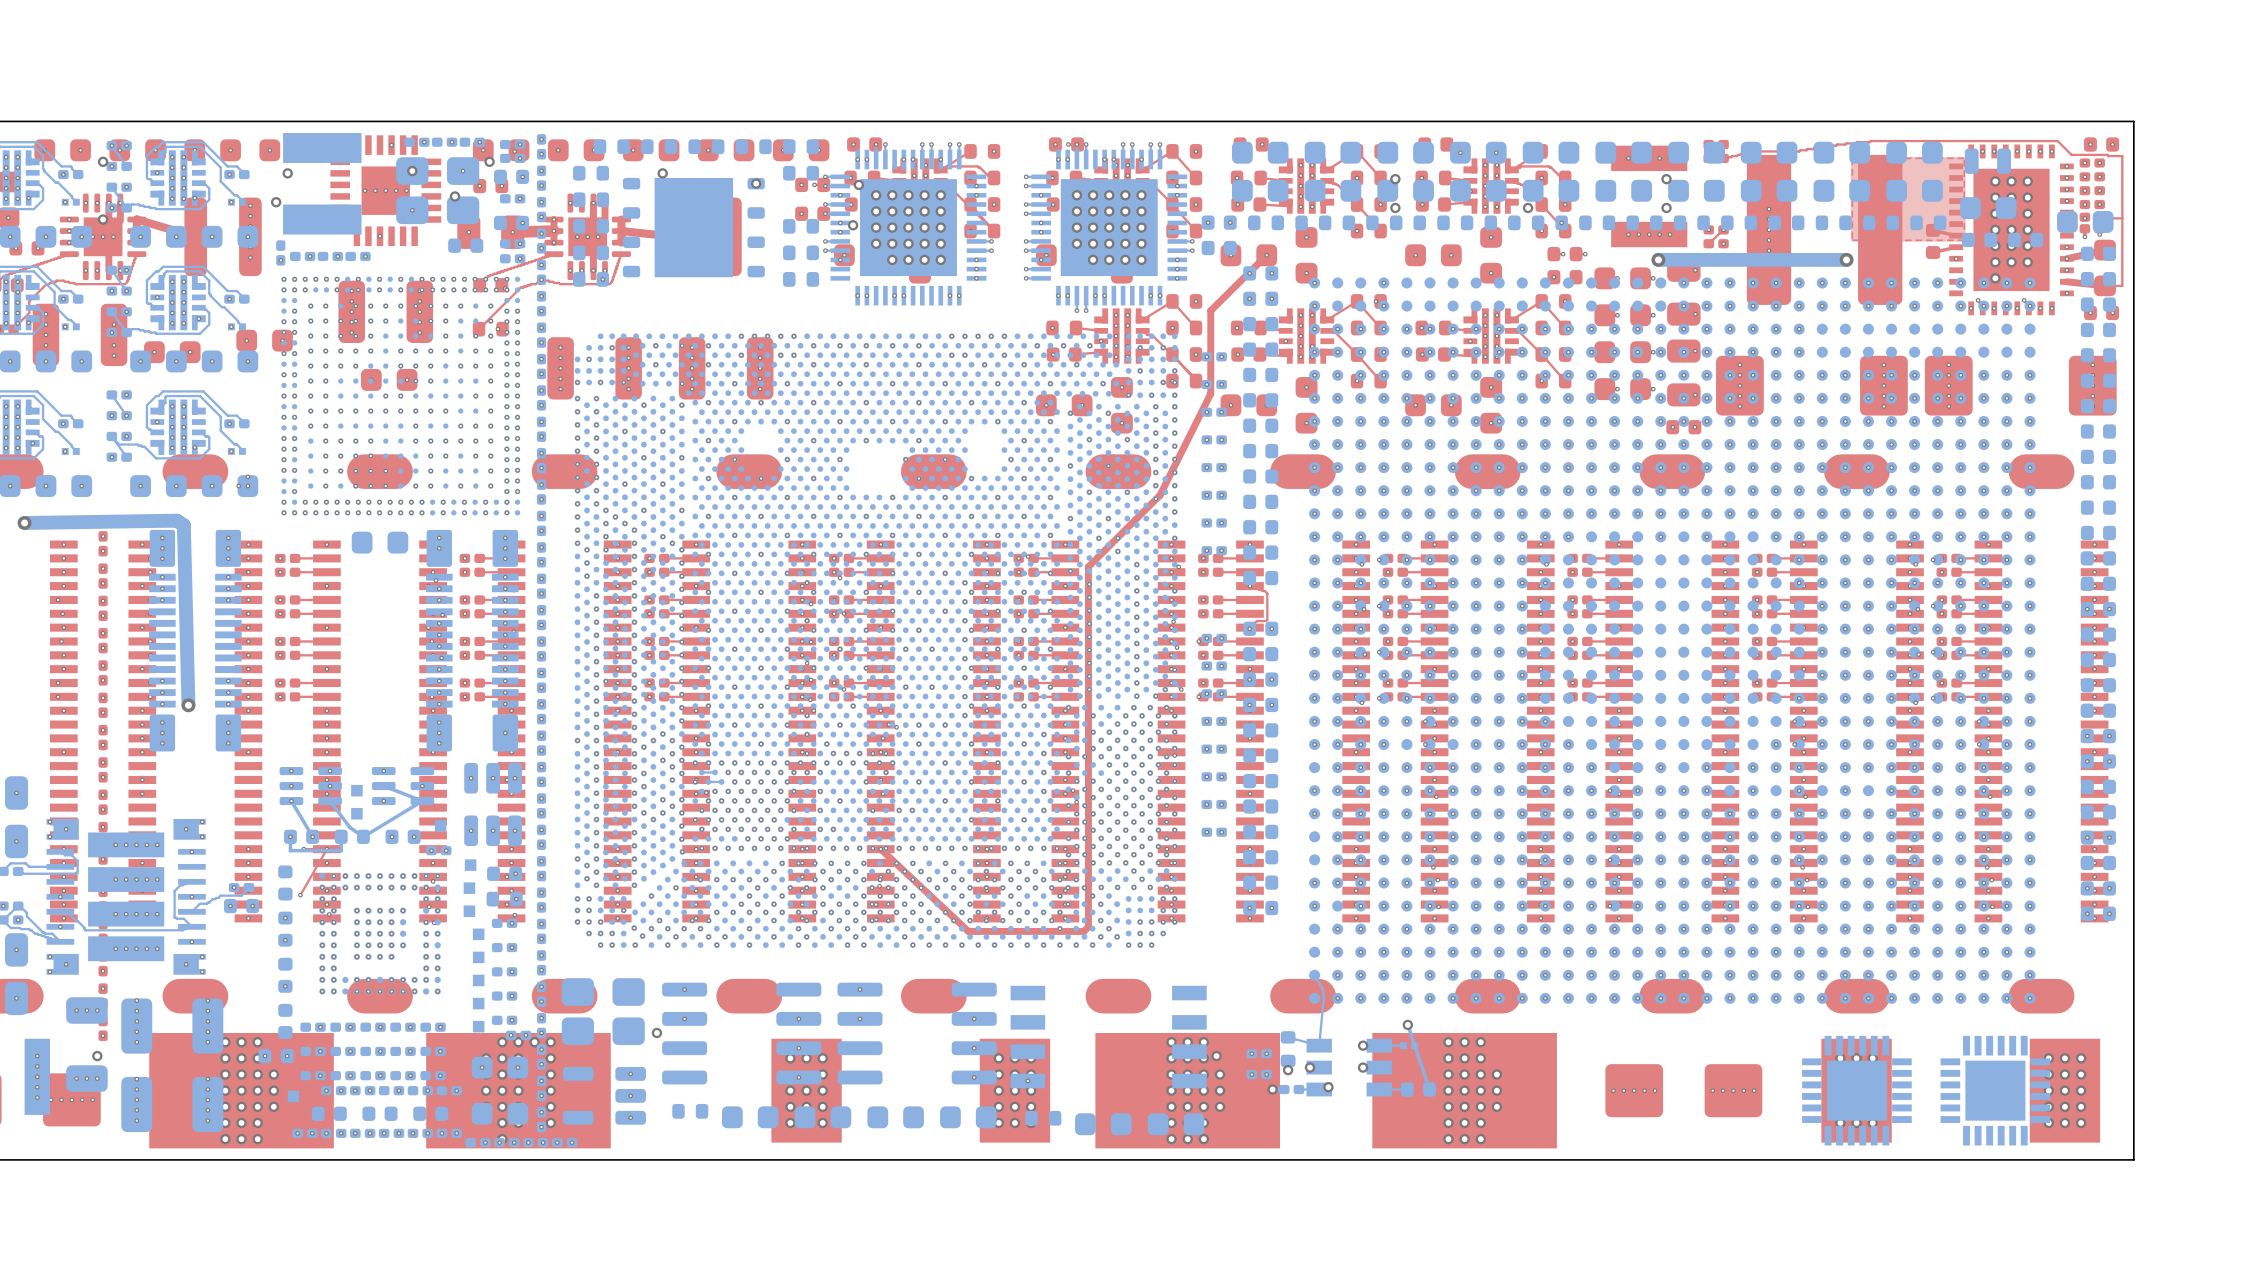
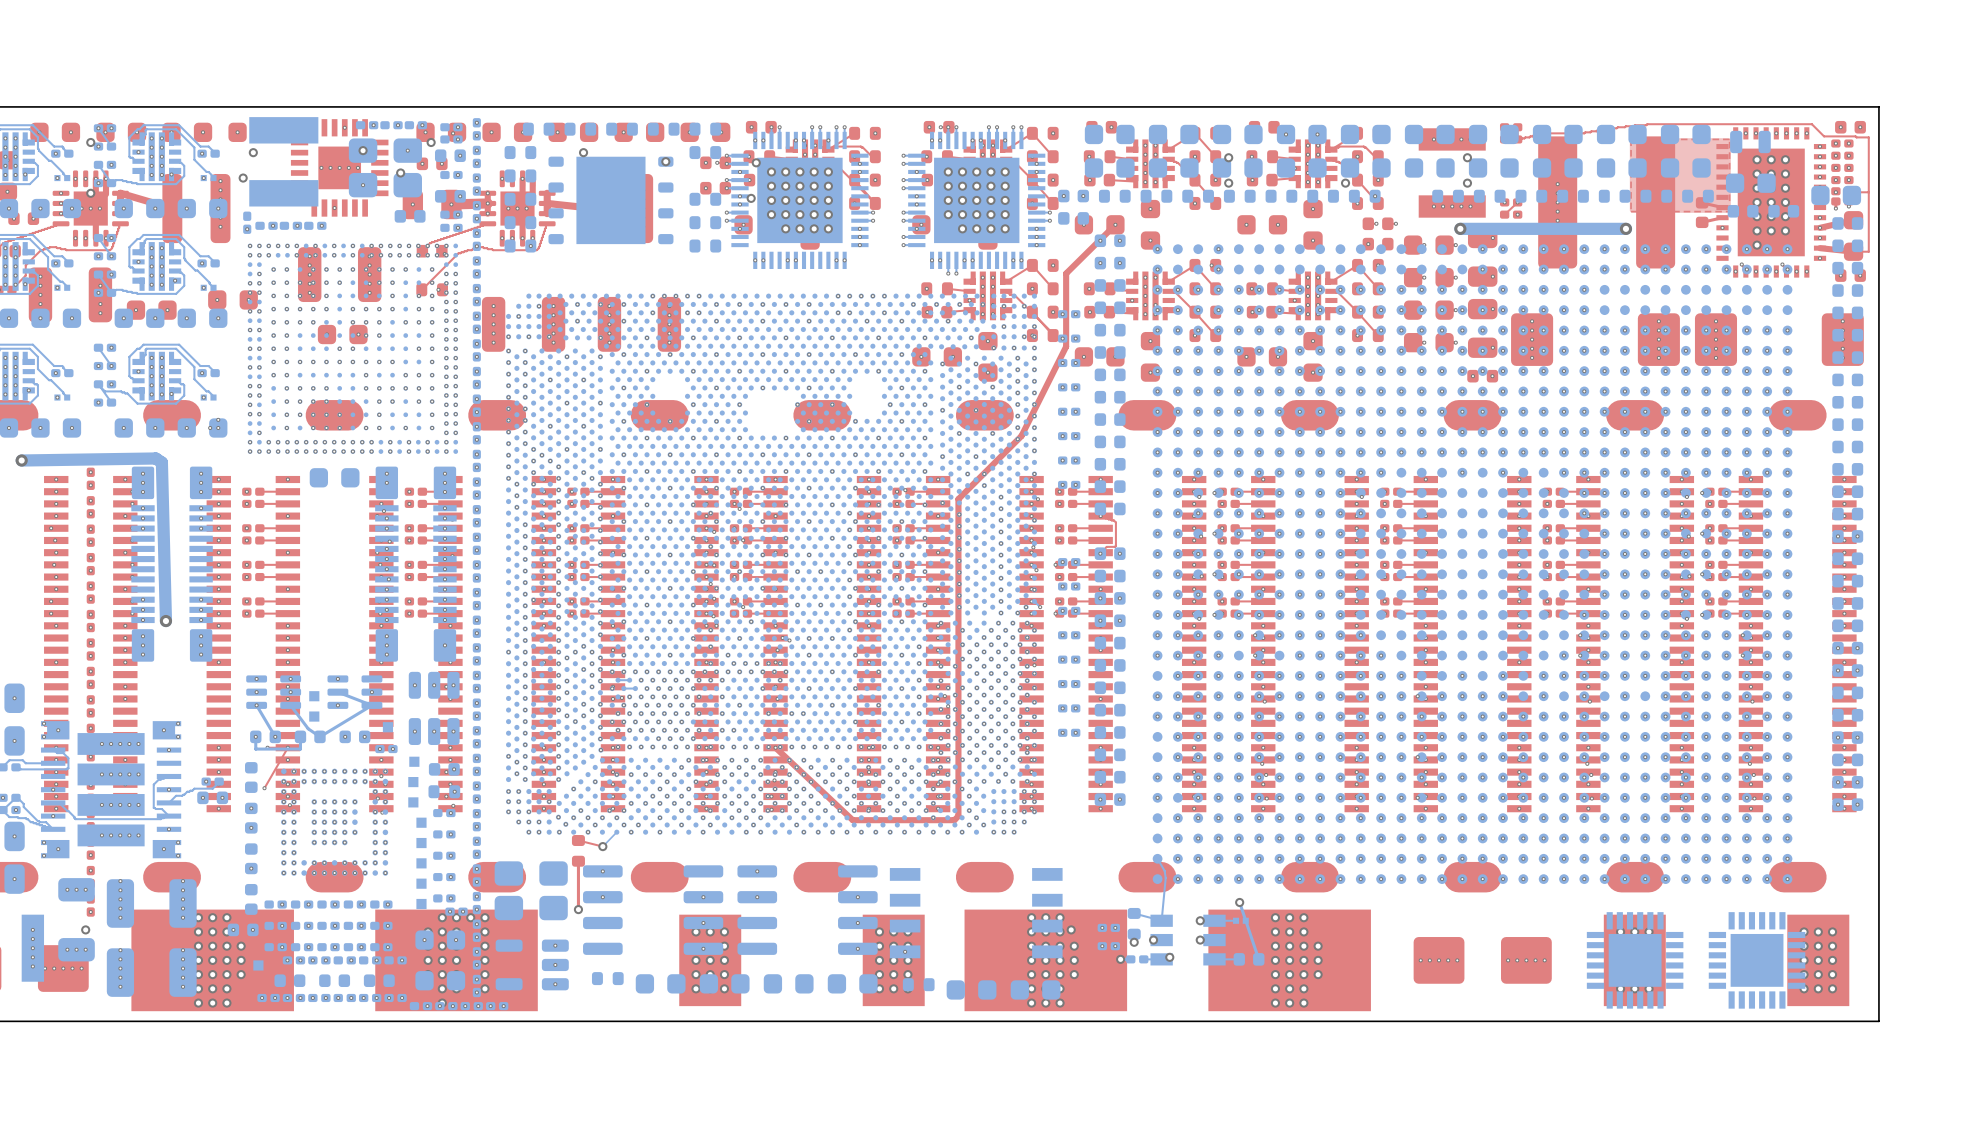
part: (1597, 222) -> none
bottom track: none -> (616, 832) (602, 846)
top track: none -> (578, 840) (602, 846)
via: none -> (602, 846)
part: none -> (578, 850)
top track: none -> (578, 861) (578, 909)

